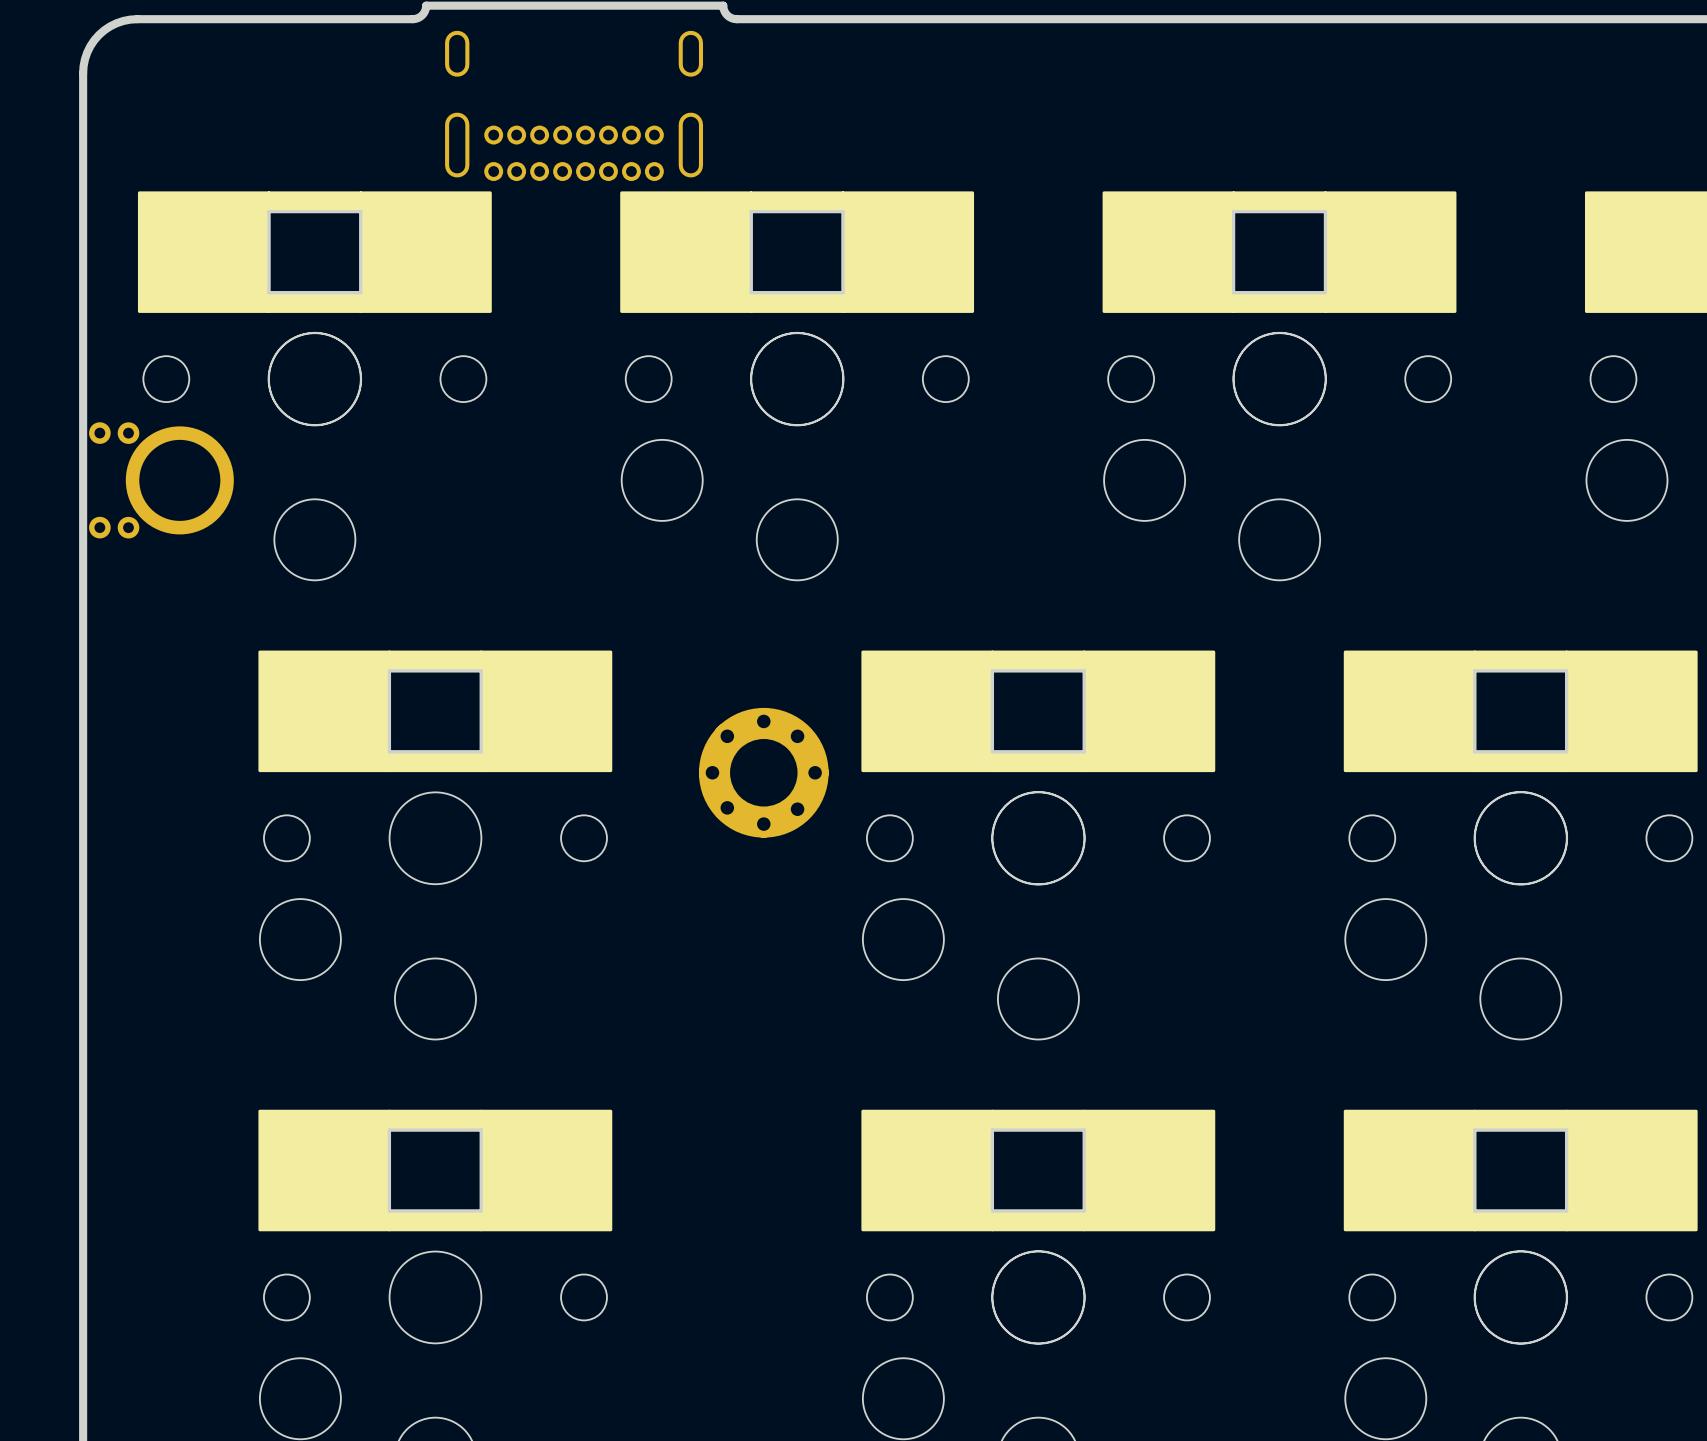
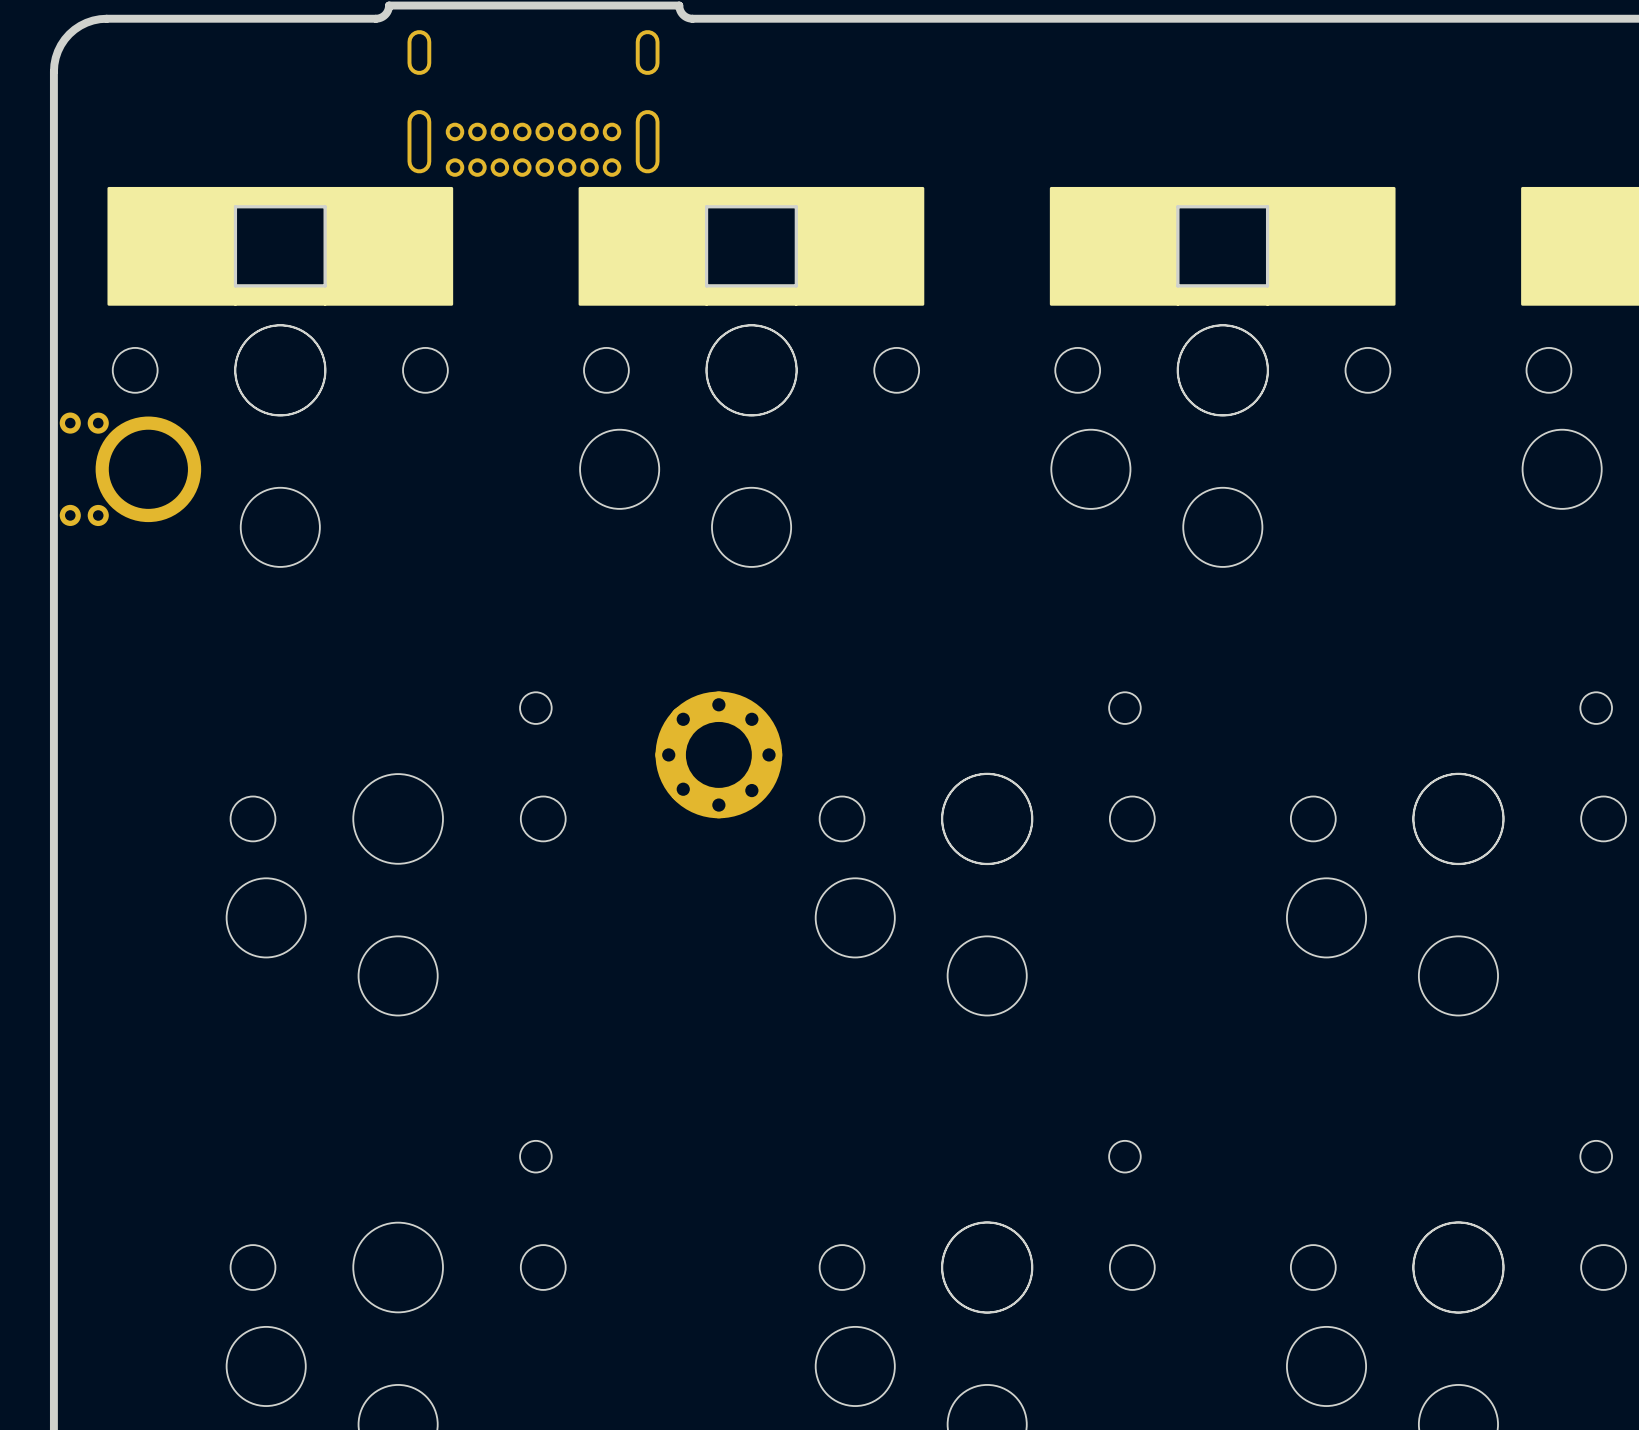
part: (435, 711) -> none
part: (1038, 711) -> none
part: (1520, 711) -> none
part: (435, 1170) -> none
part: (1038, 1170) -> none
part: (1520, 1170) -> none

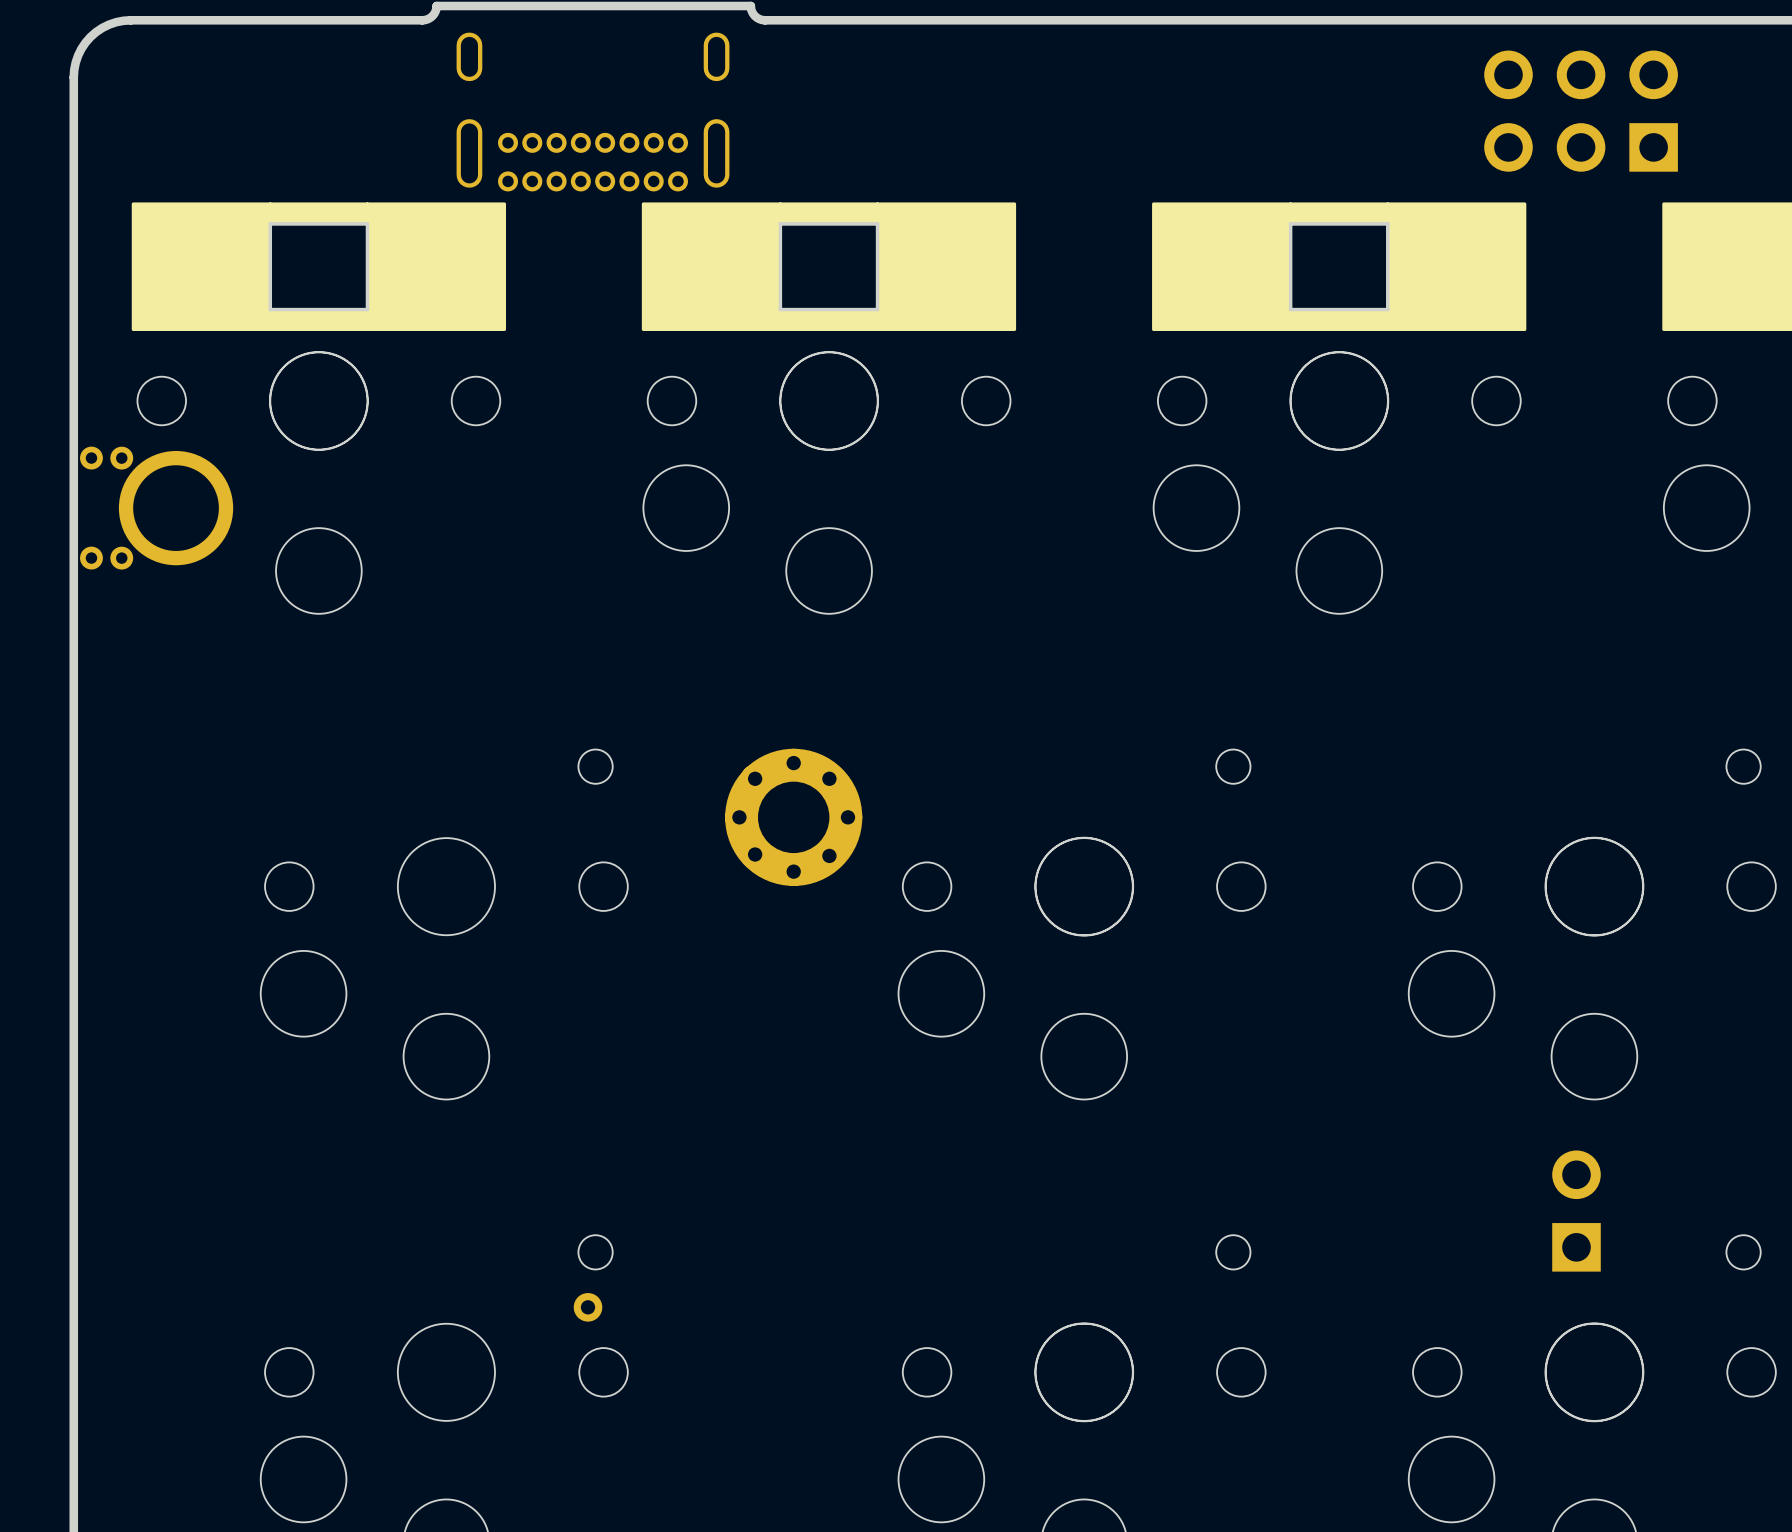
part: none -> (1581, 111)
part: none -> (1576, 1211)
part: none -> (588, 1307)

